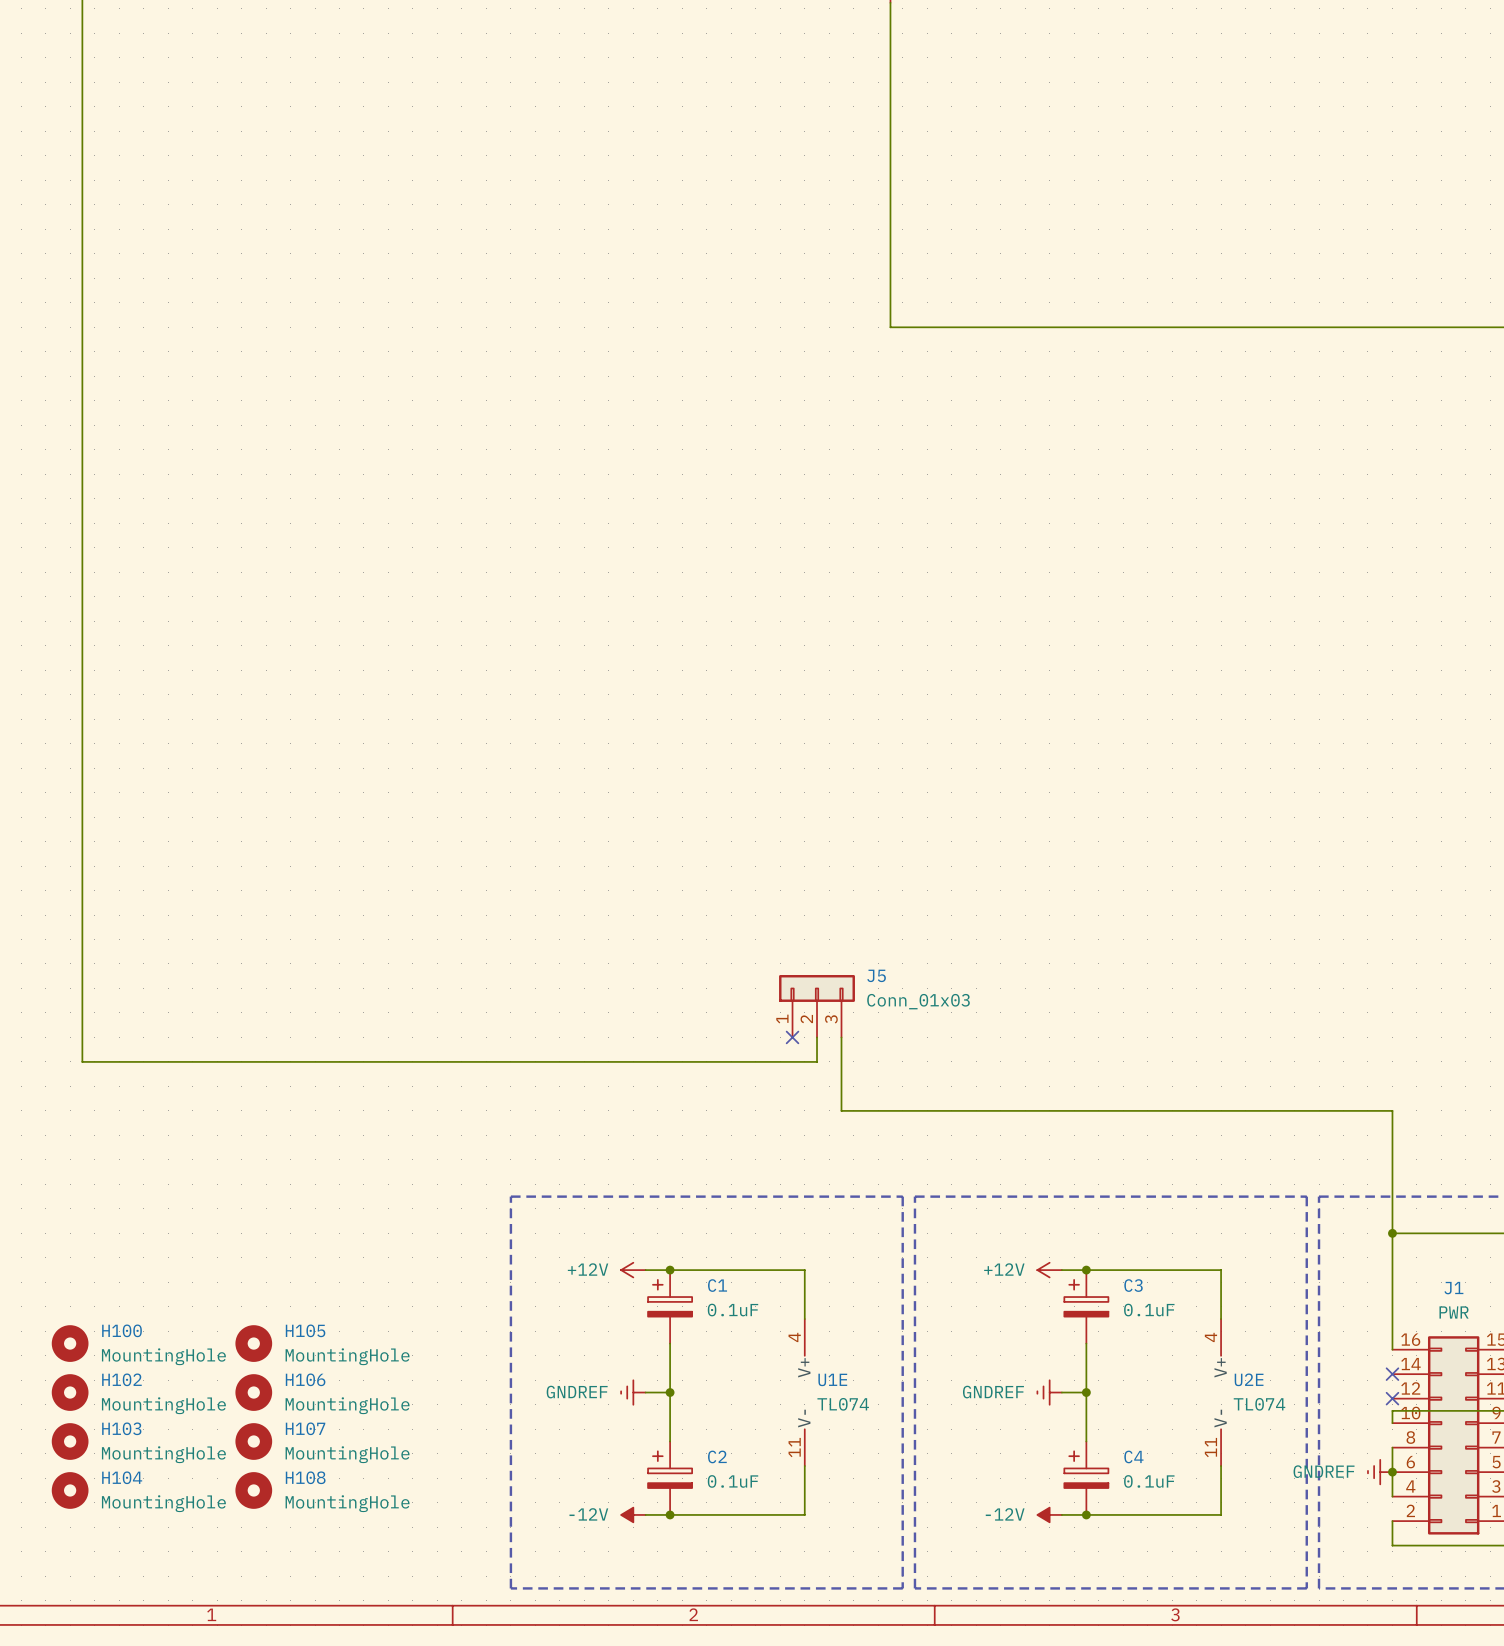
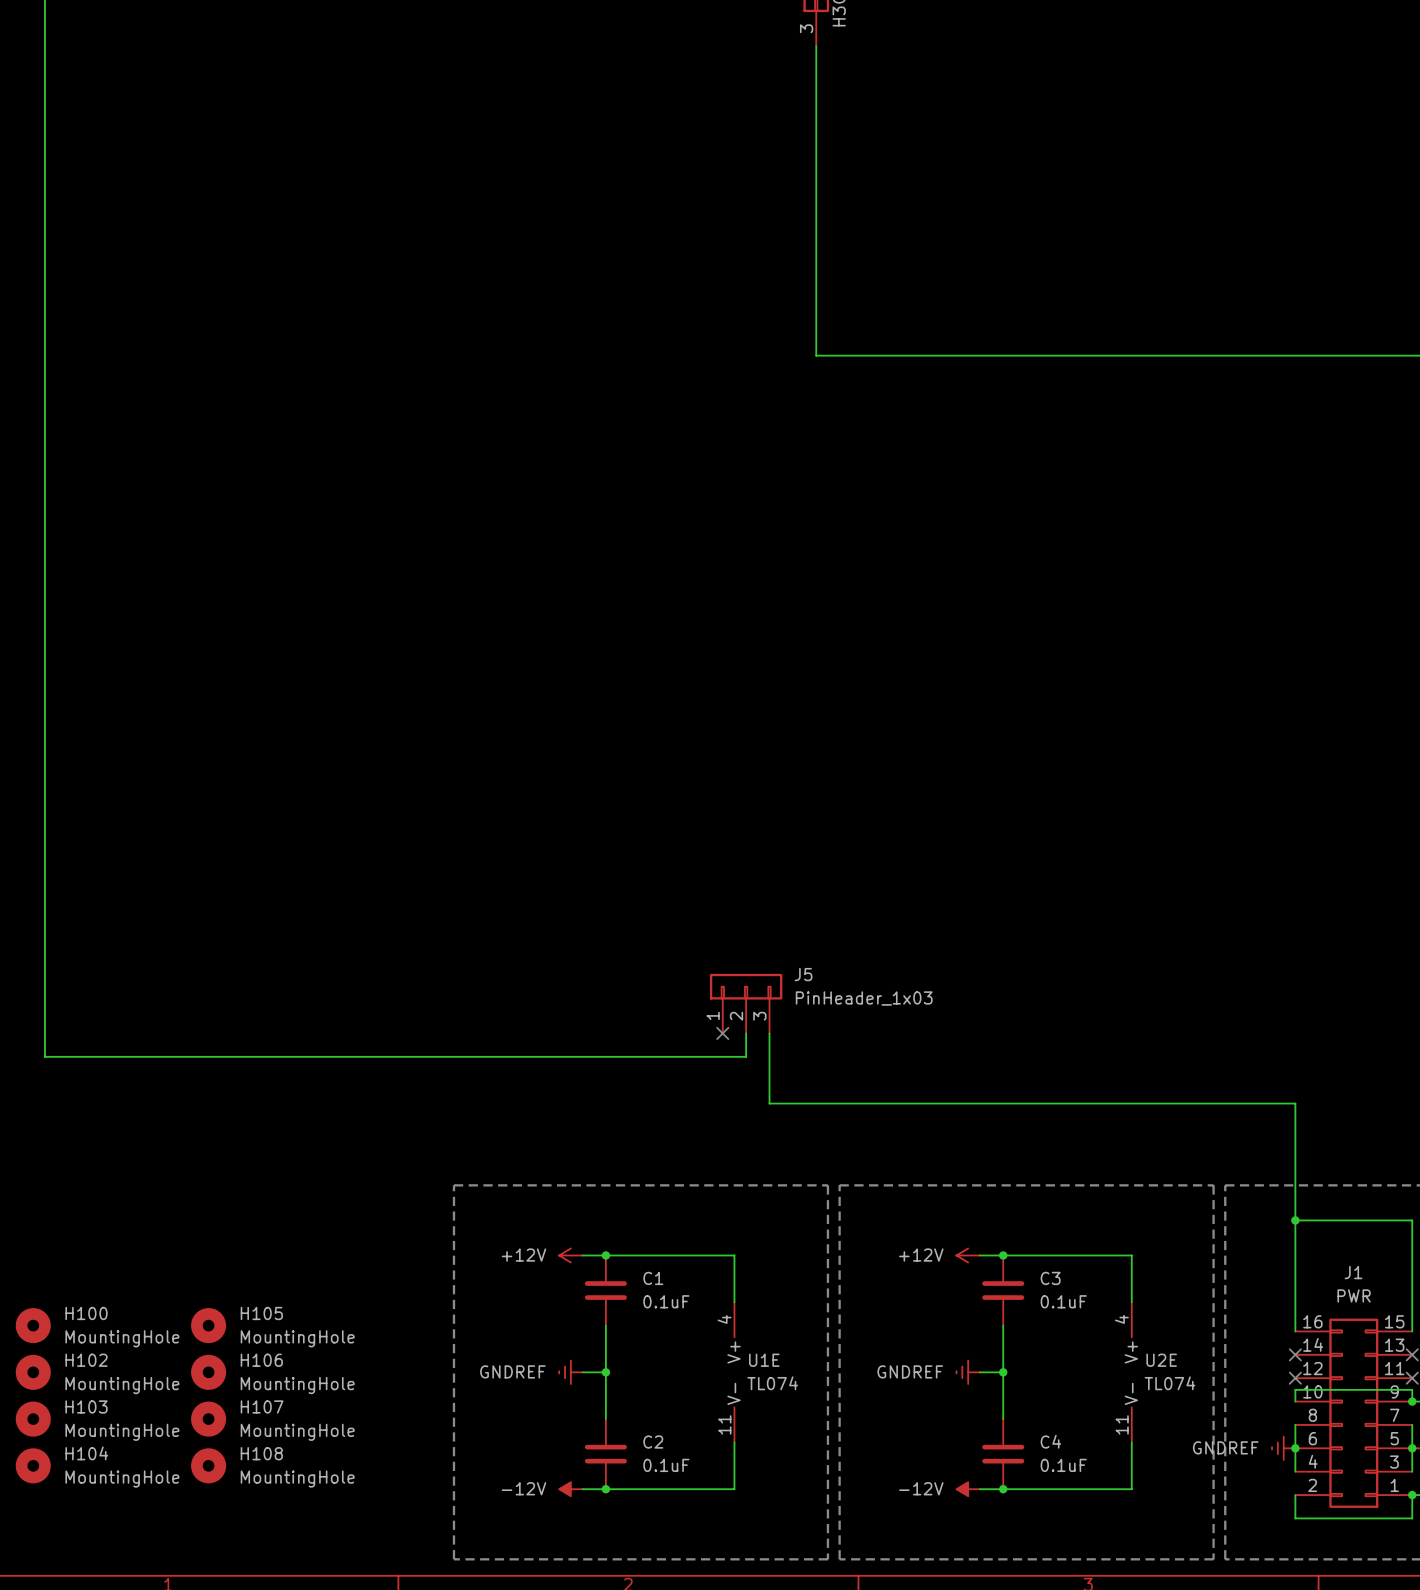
J5 value: Conn_01x03 (918, 1001) -> PinHeader_1x03 (864, 998)
C1 symbol: [648, 1270, 693, 1344] -> [584, 1255, 627, 1326]
C3 symbol: [1064, 1270, 1109, 1344] -> [982, 1255, 1025, 1326]
C2 symbol: [648, 1441, 693, 1515] -> [584, 1419, 627, 1490]
C4 symbol: [1064, 1441, 1109, 1515] -> [982, 1419, 1025, 1490]

